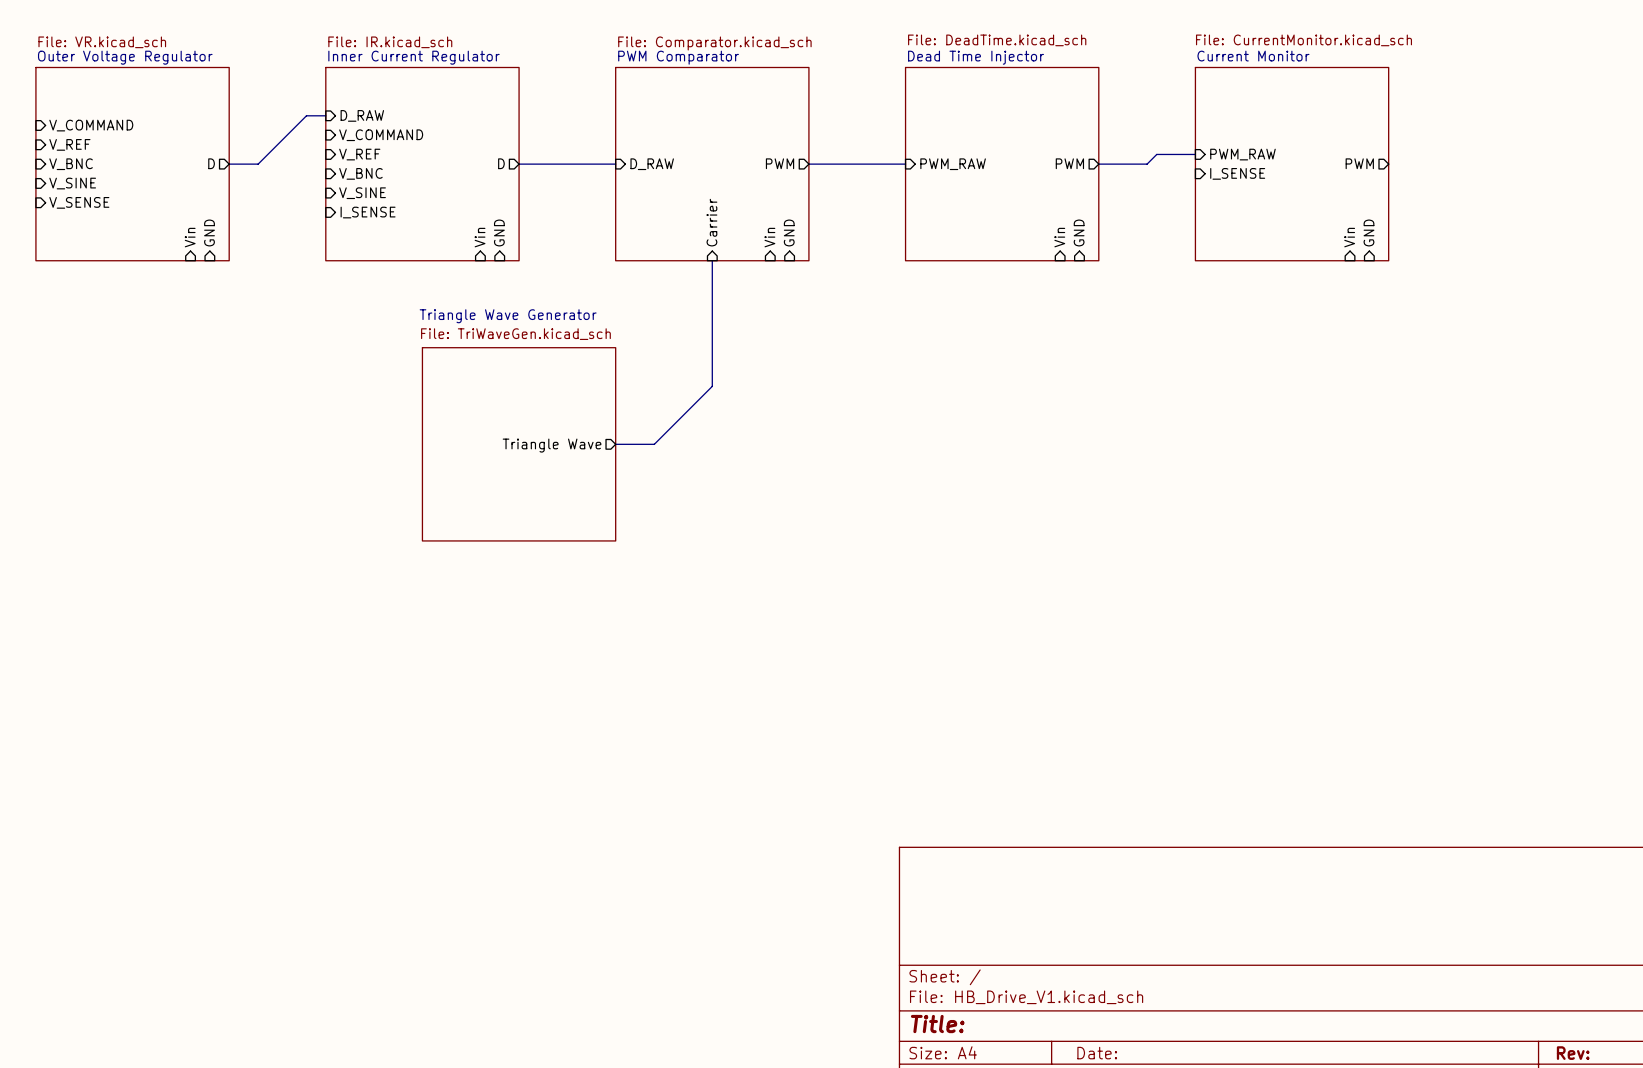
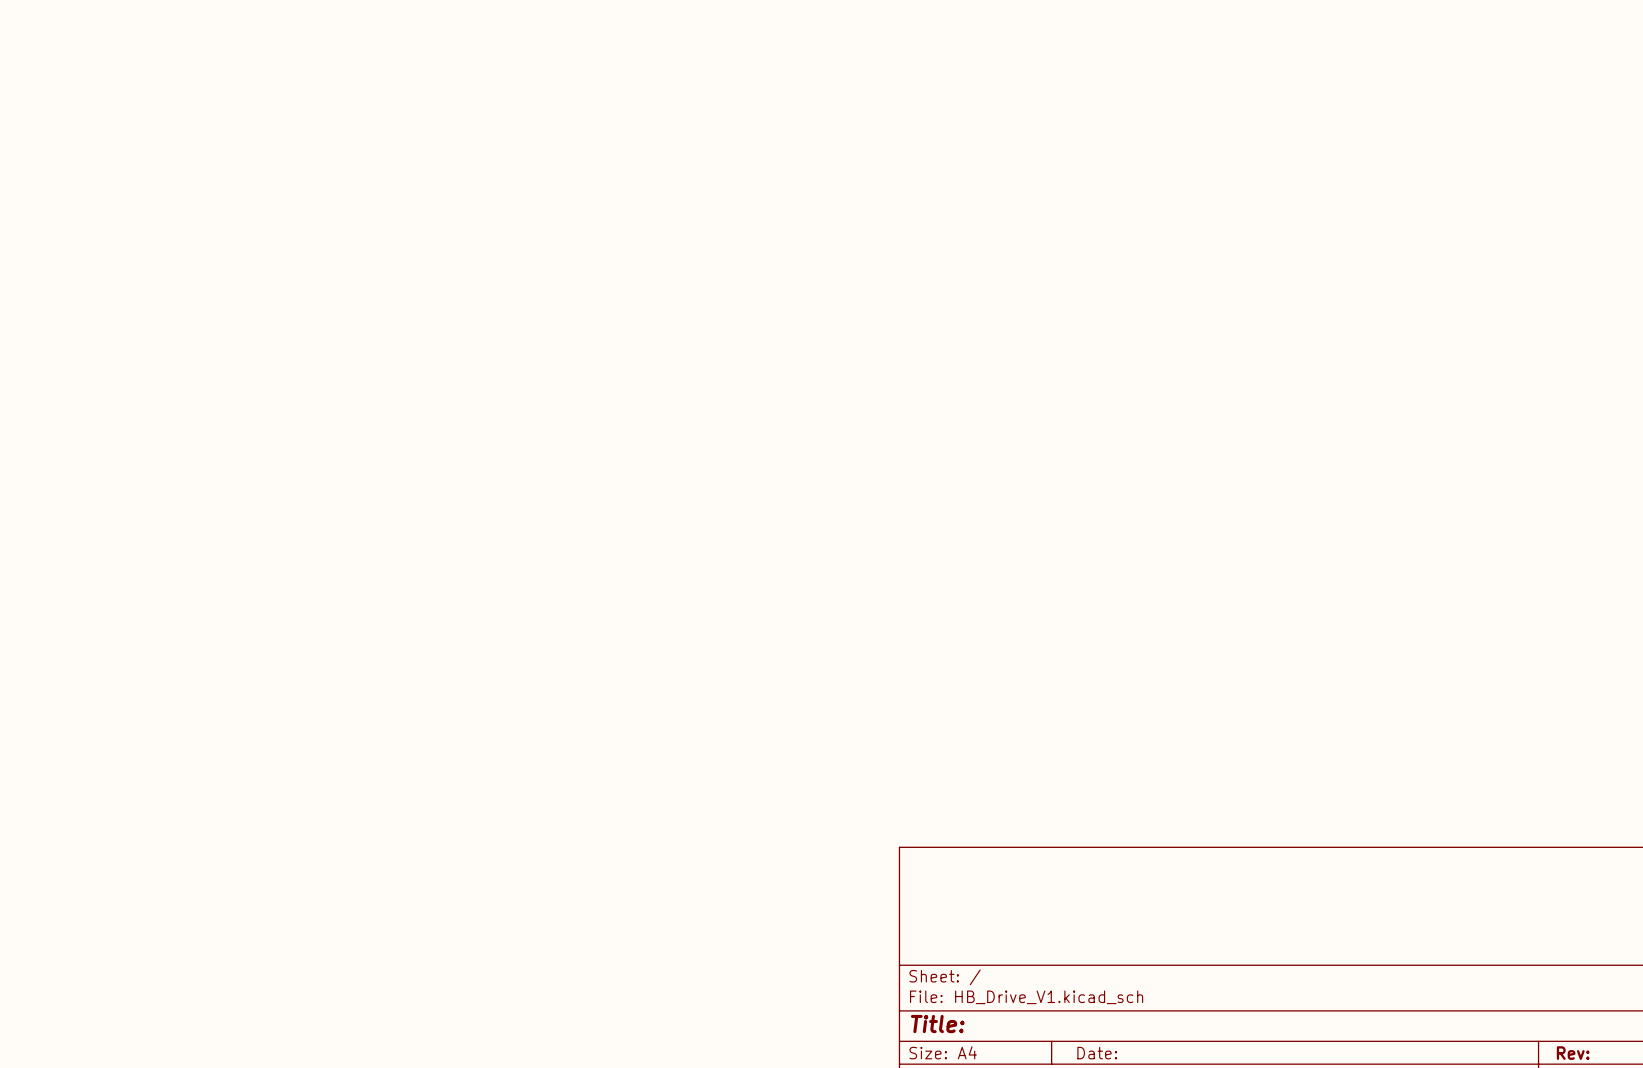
wire: (325, 115) (306, 115) (258, 164) (229, 164) -> none
sheet pin: D_RAW (362, 115) -> none
sheet pin: V_COMMAND (91, 125) -> none
sheet pin: V_COMMAND (381, 135) -> none
sheet pin: V_REF (69, 144) -> none
sheet pin: V_REF (359, 154) -> none
wire: (1195, 154) (1156, 154) (1147, 164) (1098, 164) -> none
sheet pin: PWM_RAW (1242, 154) -> none
sheet pin: D (211, 163) -> none
sheet pin: D (501, 163) -> none
sheet pin: PWM (780, 163) -> none
sheet pin: PWM (1069, 163) -> none
sheet pin: PWM (1359, 163) -> none
sheet pin: V_BNC (71, 164) -> none
sheet Outer Voltage Regulator: File: VR.kicad_sch (132, 164) -> none
sheet Inner Current Regulator: File: IR.kicad_sch (422, 164) -> none
wire: (519, 164) (615, 164) -> none
sheet pin: D_RAW (652, 164) -> none
sheet PWM Comparator: File: Comparator.kicad_sch (712, 164) -> none
wire: (808, 164) (905, 164) -> none
sheet pin: PWM_RAW (953, 164) -> none
sheet Dead Time Injector: File: DeadTime.kicad_sch (1002, 164) -> none
sheet Current Monitor: File: CurrentMonitor.kicad_sch (1292, 164) -> none
sheet pin: V_BNC (360, 173) -> none
sheet pin: I_SENSE (1237, 173) -> none
sheet pin: V_SINE (72, 183) -> none
sheet pin: V_SINE (362, 193) -> none
sheet pin: V_SENSE (79, 202) -> none
sheet pin: I_SENSE (368, 212) -> none
sheet pin: Carrier (711, 222) -> none
sheet pin: GND (209, 232) -> none
sheet pin: GND (499, 232) -> none
sheet pin: GND (789, 232) -> none
sheet pin: GND (1079, 232) -> none
sheet pin: GND (1368, 232) -> none
sheet pin: Vin (190, 237) -> none
sheet pin: Vin (480, 237) -> none
sheet pin: Vin (769, 237) -> none
sheet pin: Vin (1059, 237) -> none
sheet pin: Vin (1349, 237) -> none
wire: (712, 260) (712, 386) (654, 444) (615, 444) -> none
sheet Triangle Wave Generator: File: TriWaveGen.kicad_sch (519, 444) -> none
sheet pin: Triangle Wave (552, 445) -> none

